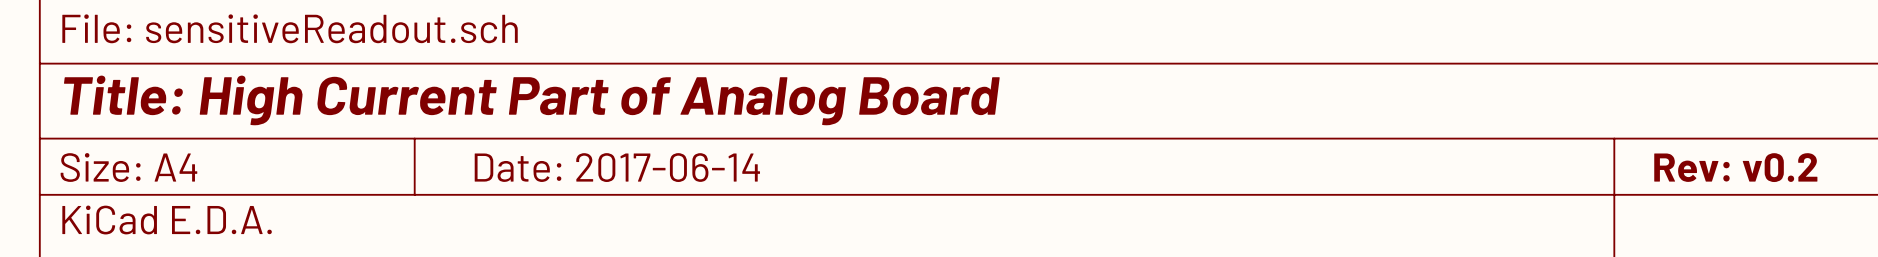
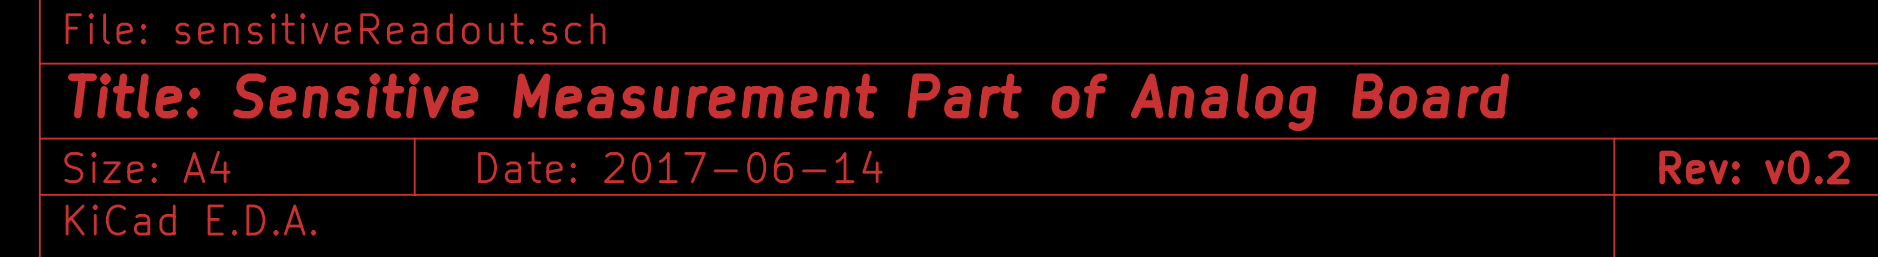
title block: Title: High Current Part of Analog Board (531, 100) -> Title: Sensitive Measurement Part of Analog Board (788, 102)

